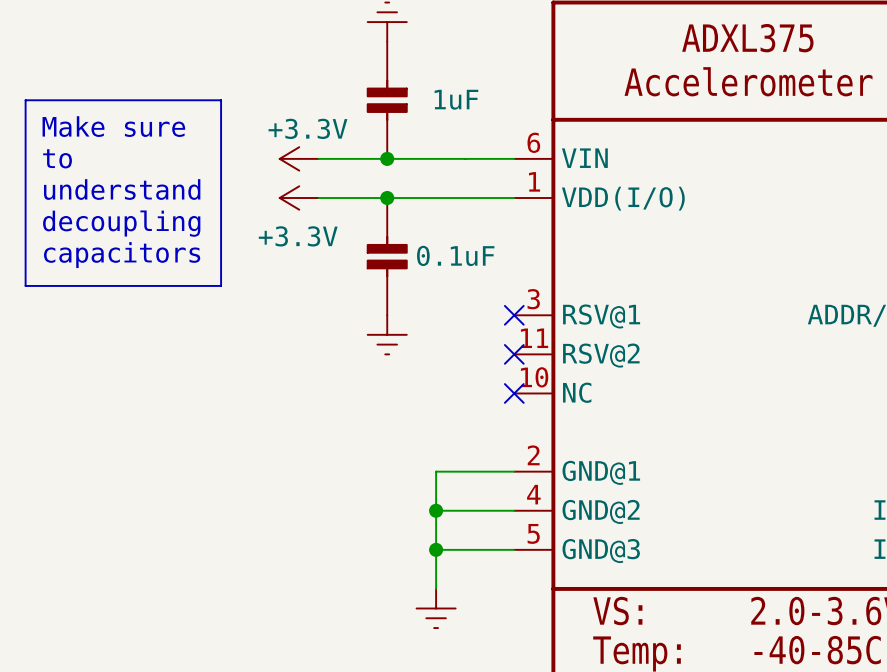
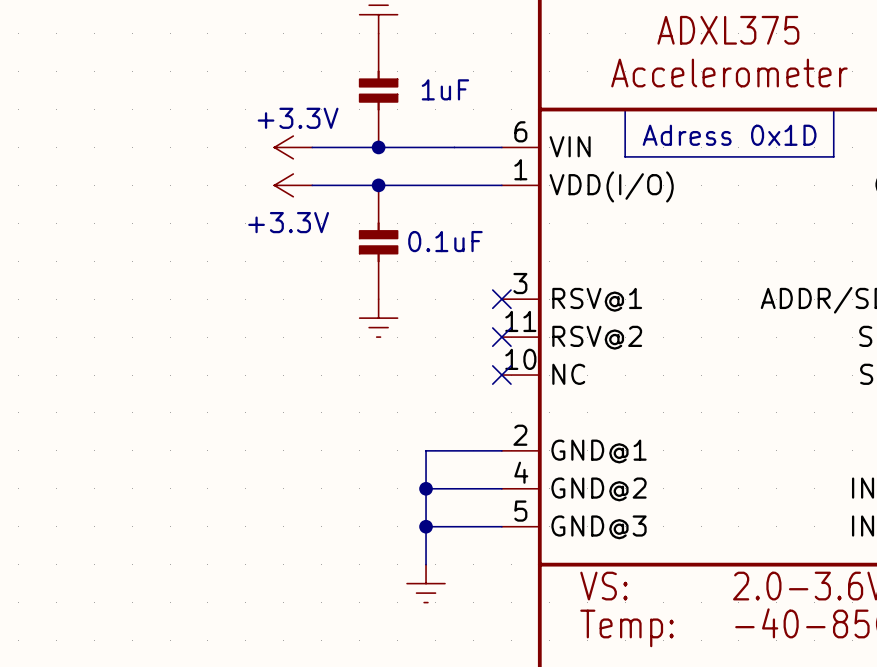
line: (25, 100) (221, 100) (221, 285) (25, 285) (25, 100) -> none
line: none -> (625, 109) (833, 109) (833, 156) (625, 156) (625, 109)
text: Make sure (113, 126) -> none
text: none -> Adress 0x1D (729, 135)
text: to (57, 158) -> none
text: understand (122, 189) -> none
text: decoupling (121, 223) -> none
text: capacitors (122, 255) -> none

